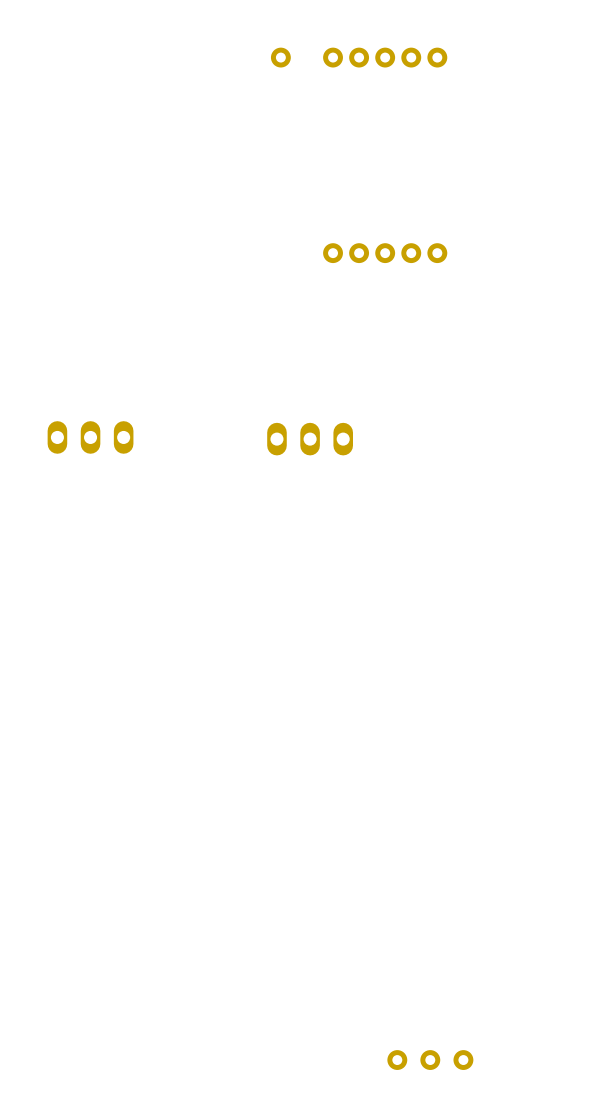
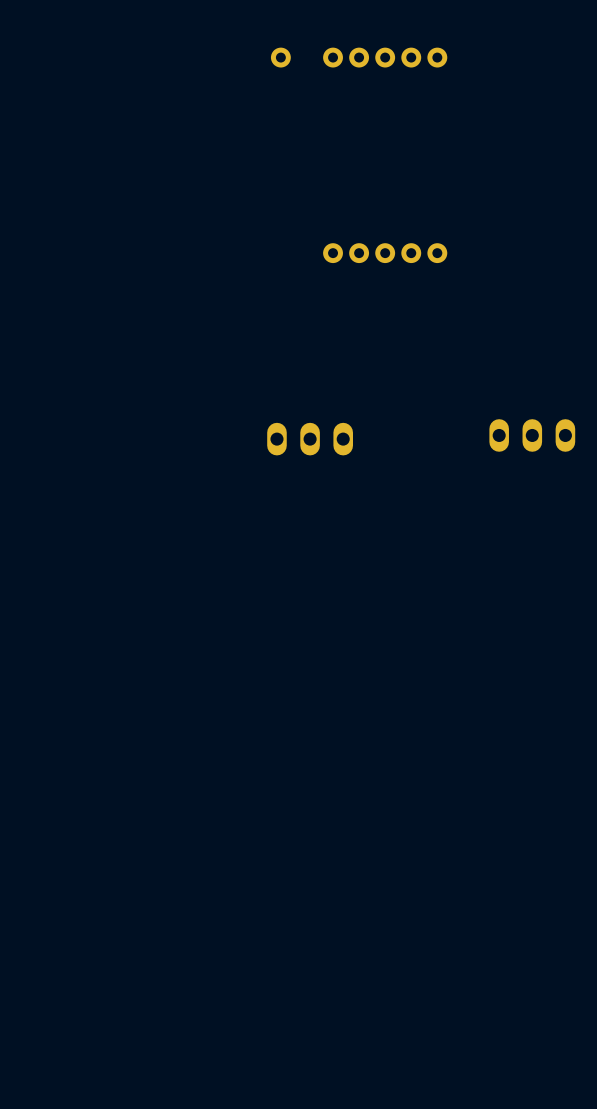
part: none -> (532, 435)
part: (90, 437) -> none
part: (430, 1060) -> none

